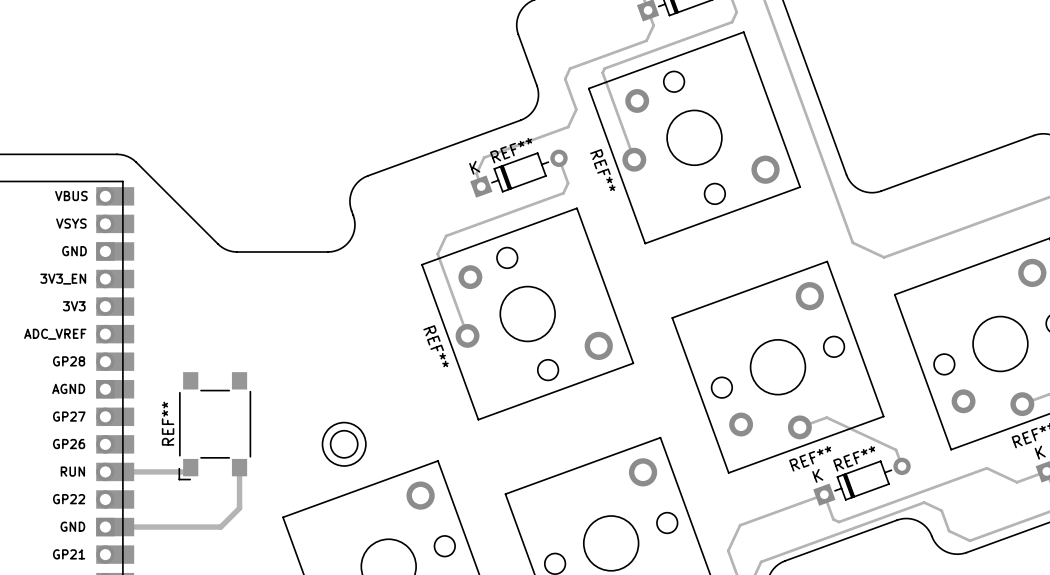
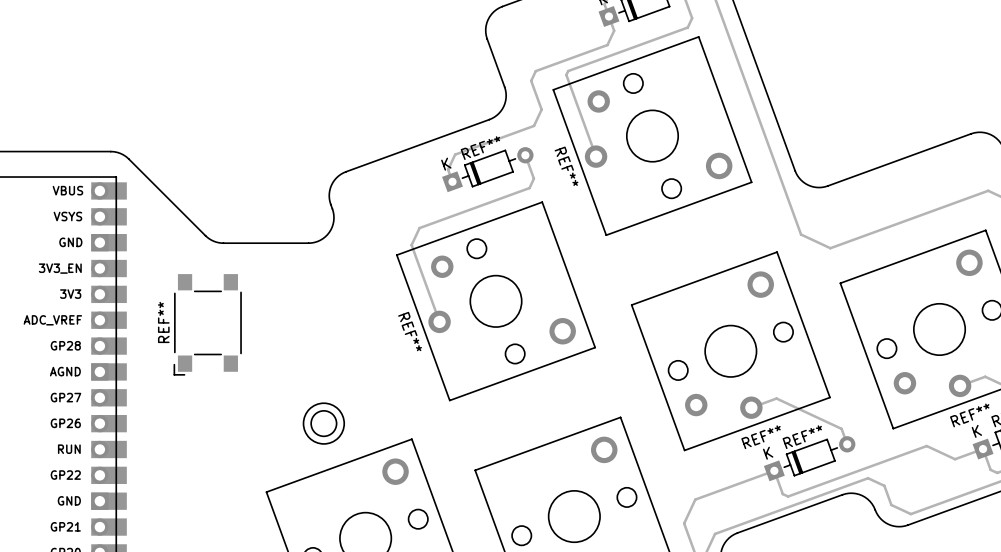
REF** position: (214, 426) -> (207, 324)
track: (190, 467) (186, 471) (105, 471) -> none
track: (239, 467) (239, 508) (220, 527) (105, 527) -> none

